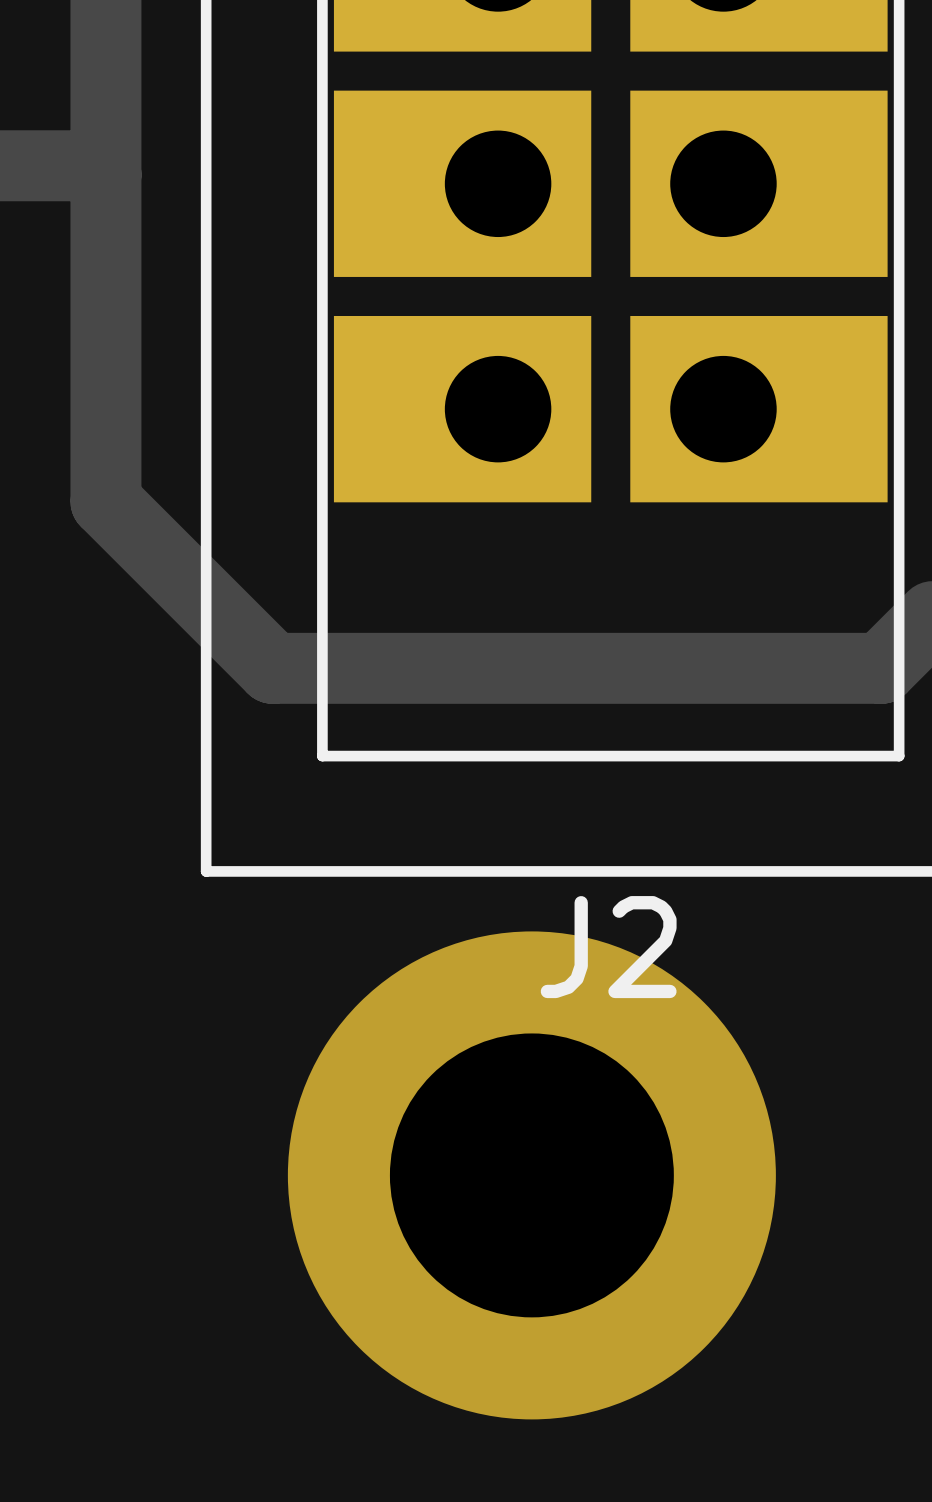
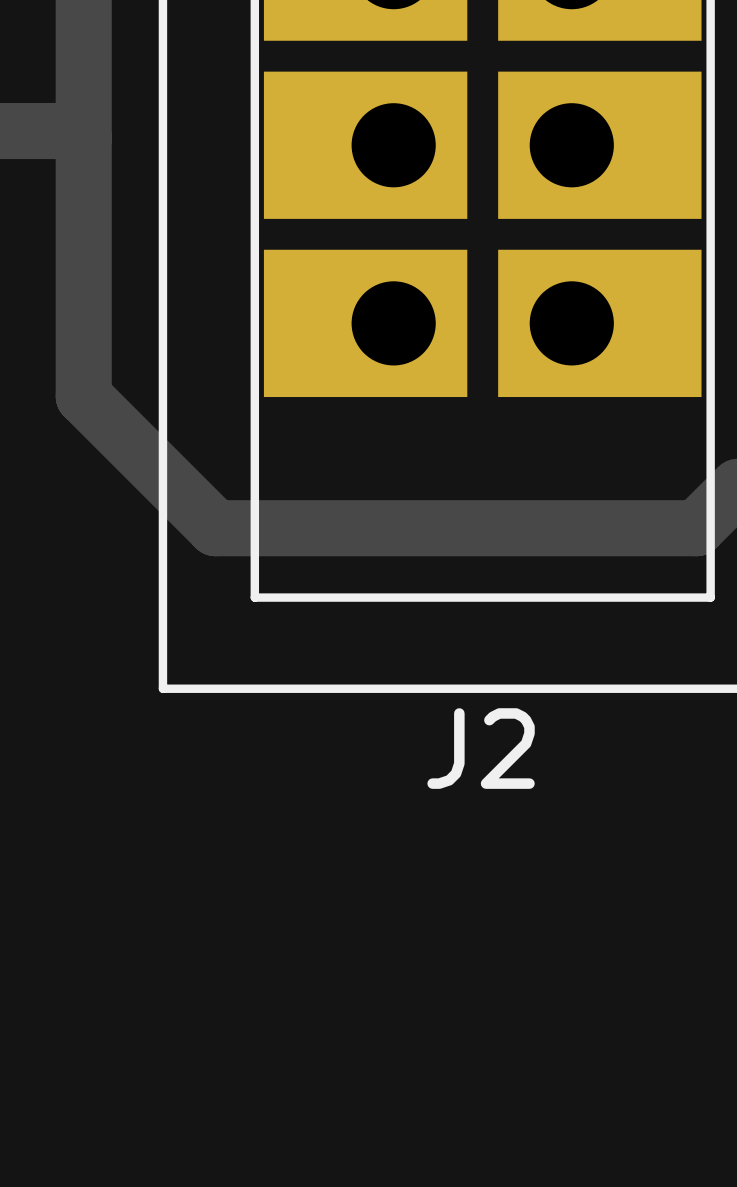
via: (531, 1175) -> none

